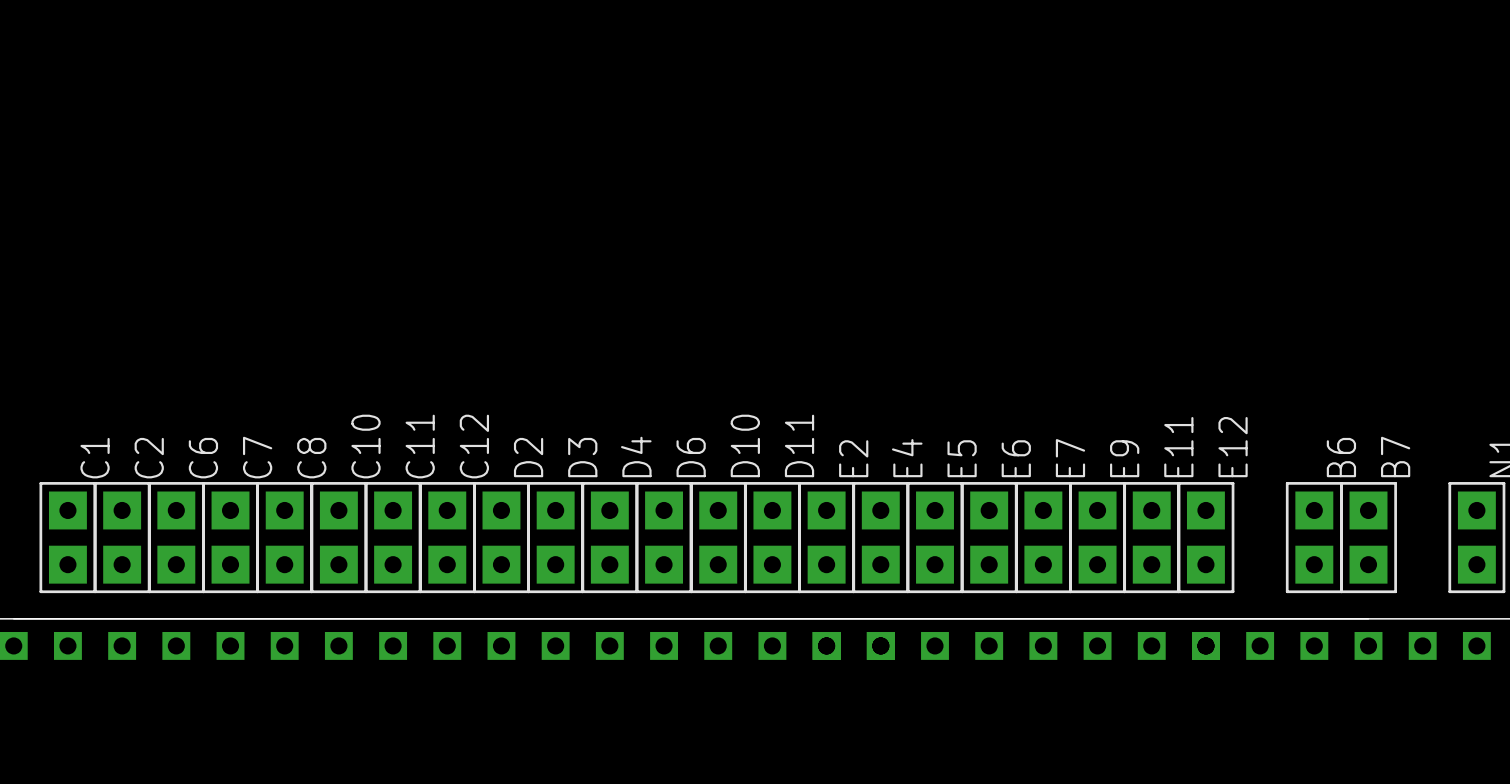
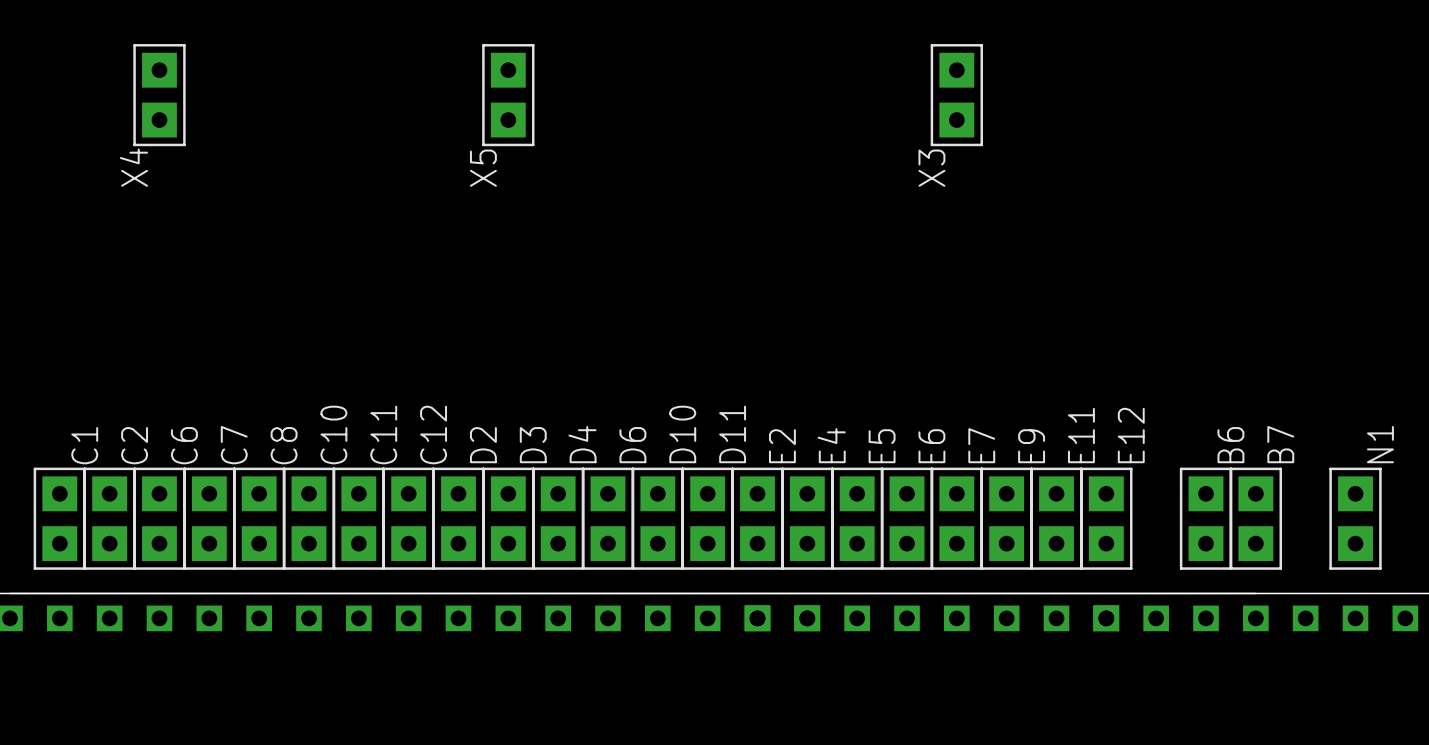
X4: none -> (159, 95)
X5: none -> (508, 95)
X3: none -> (956, 95)

